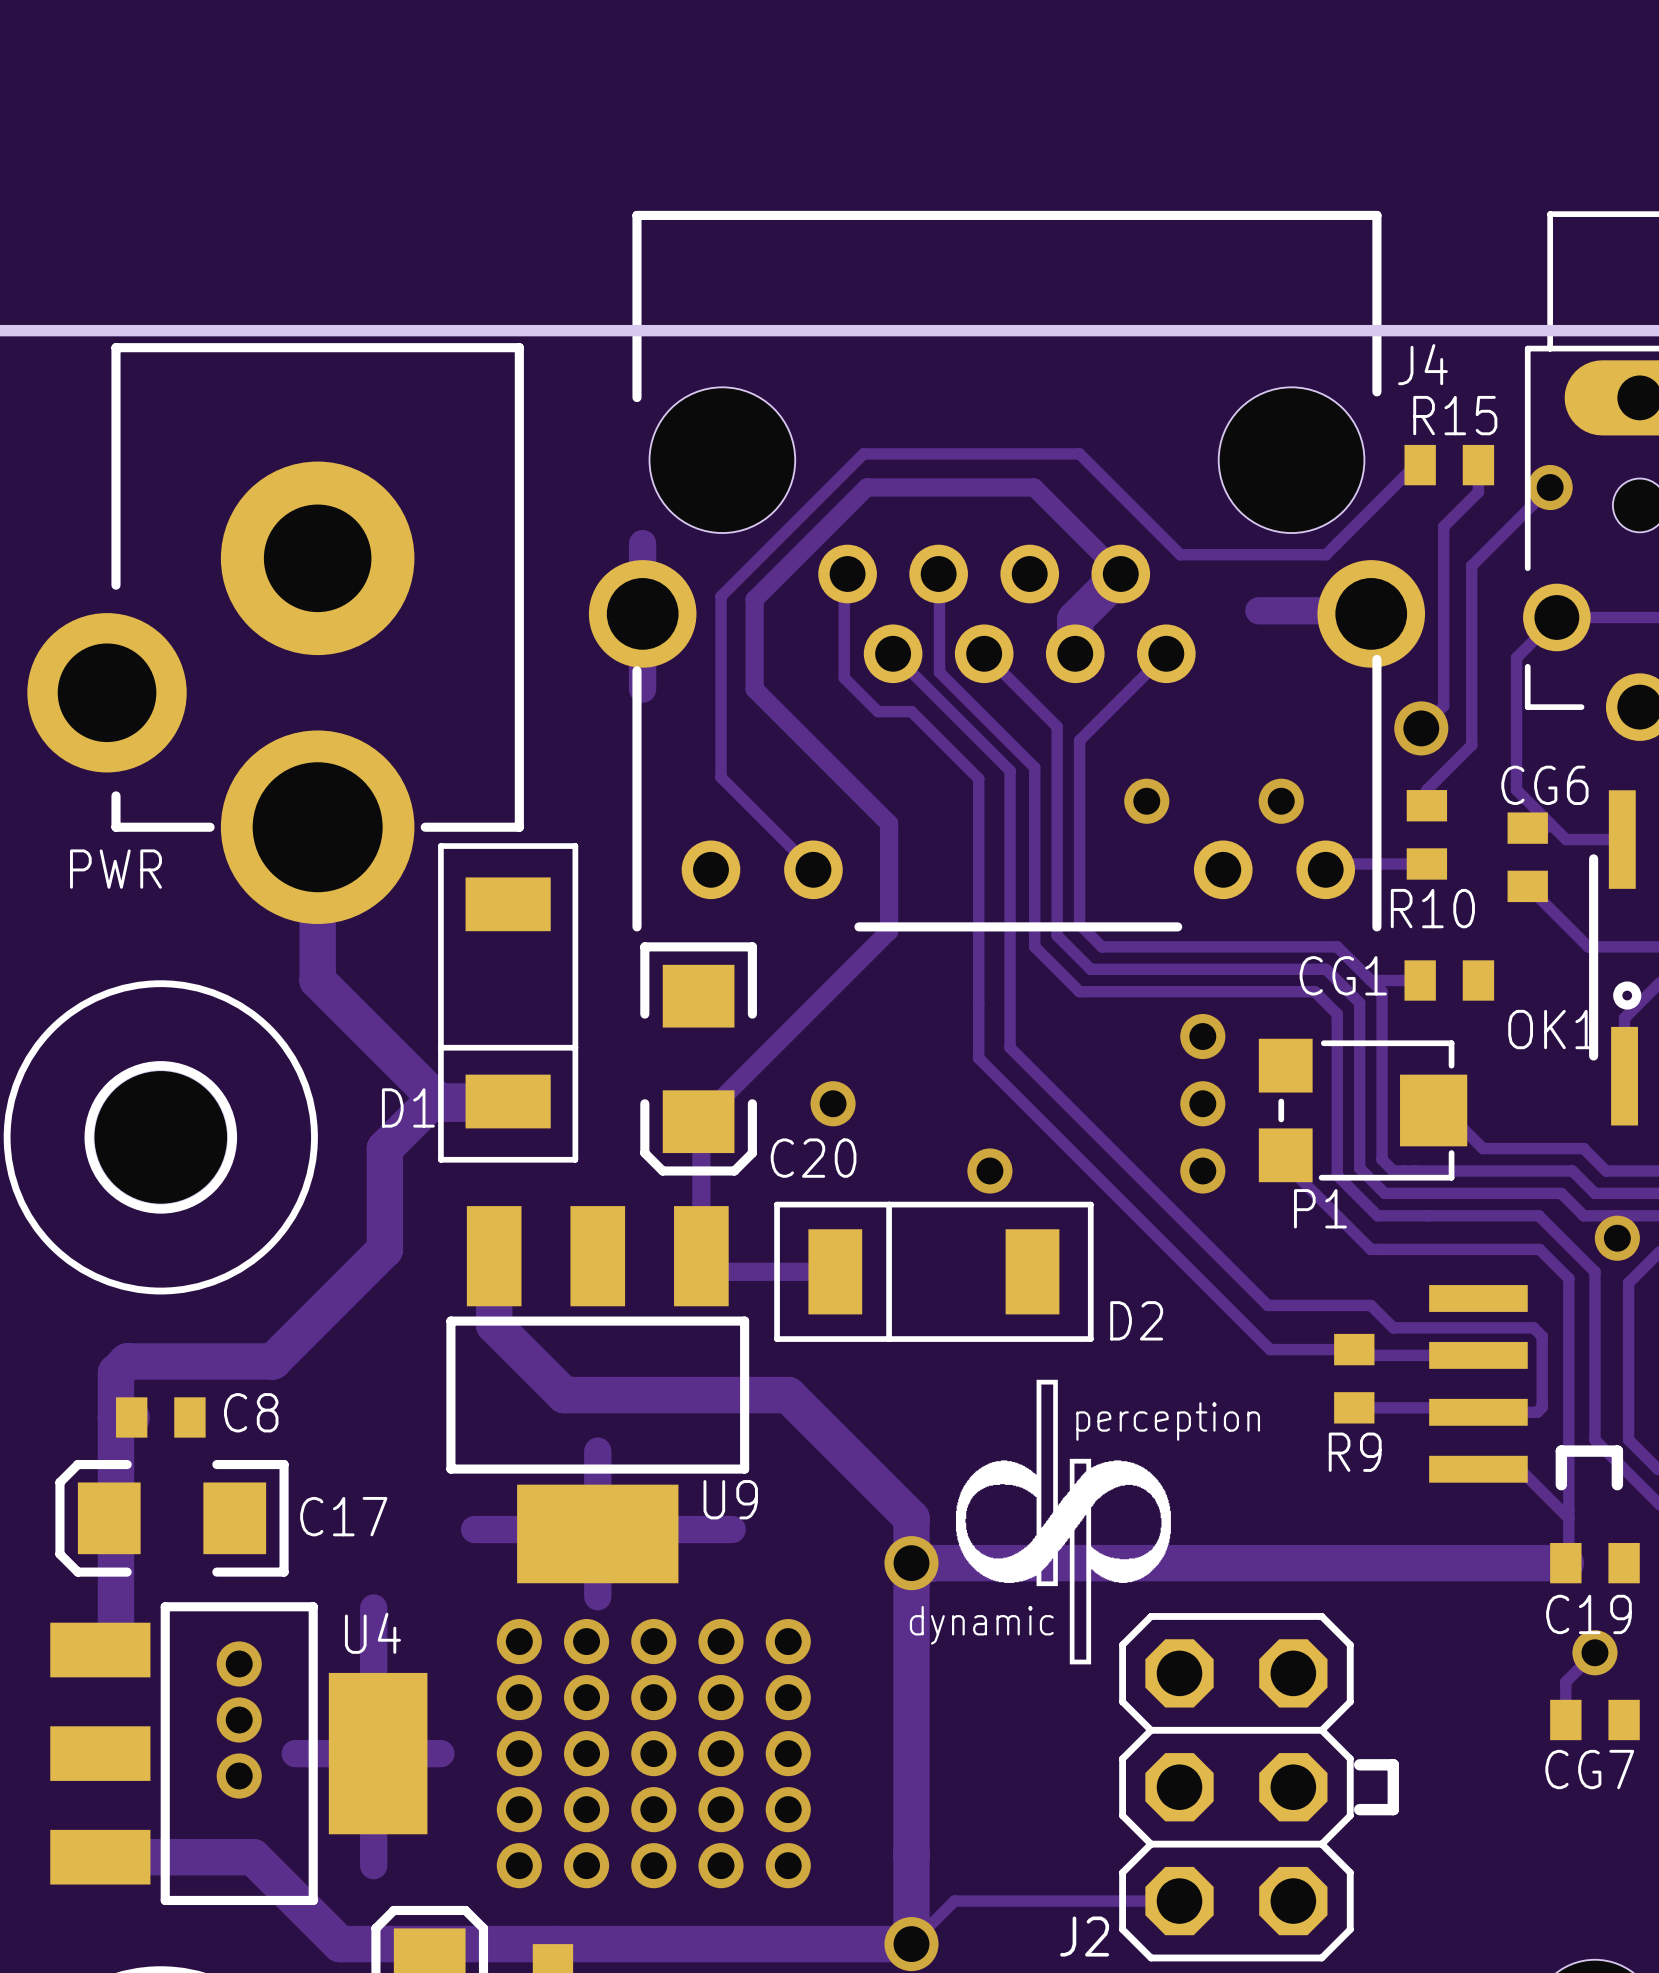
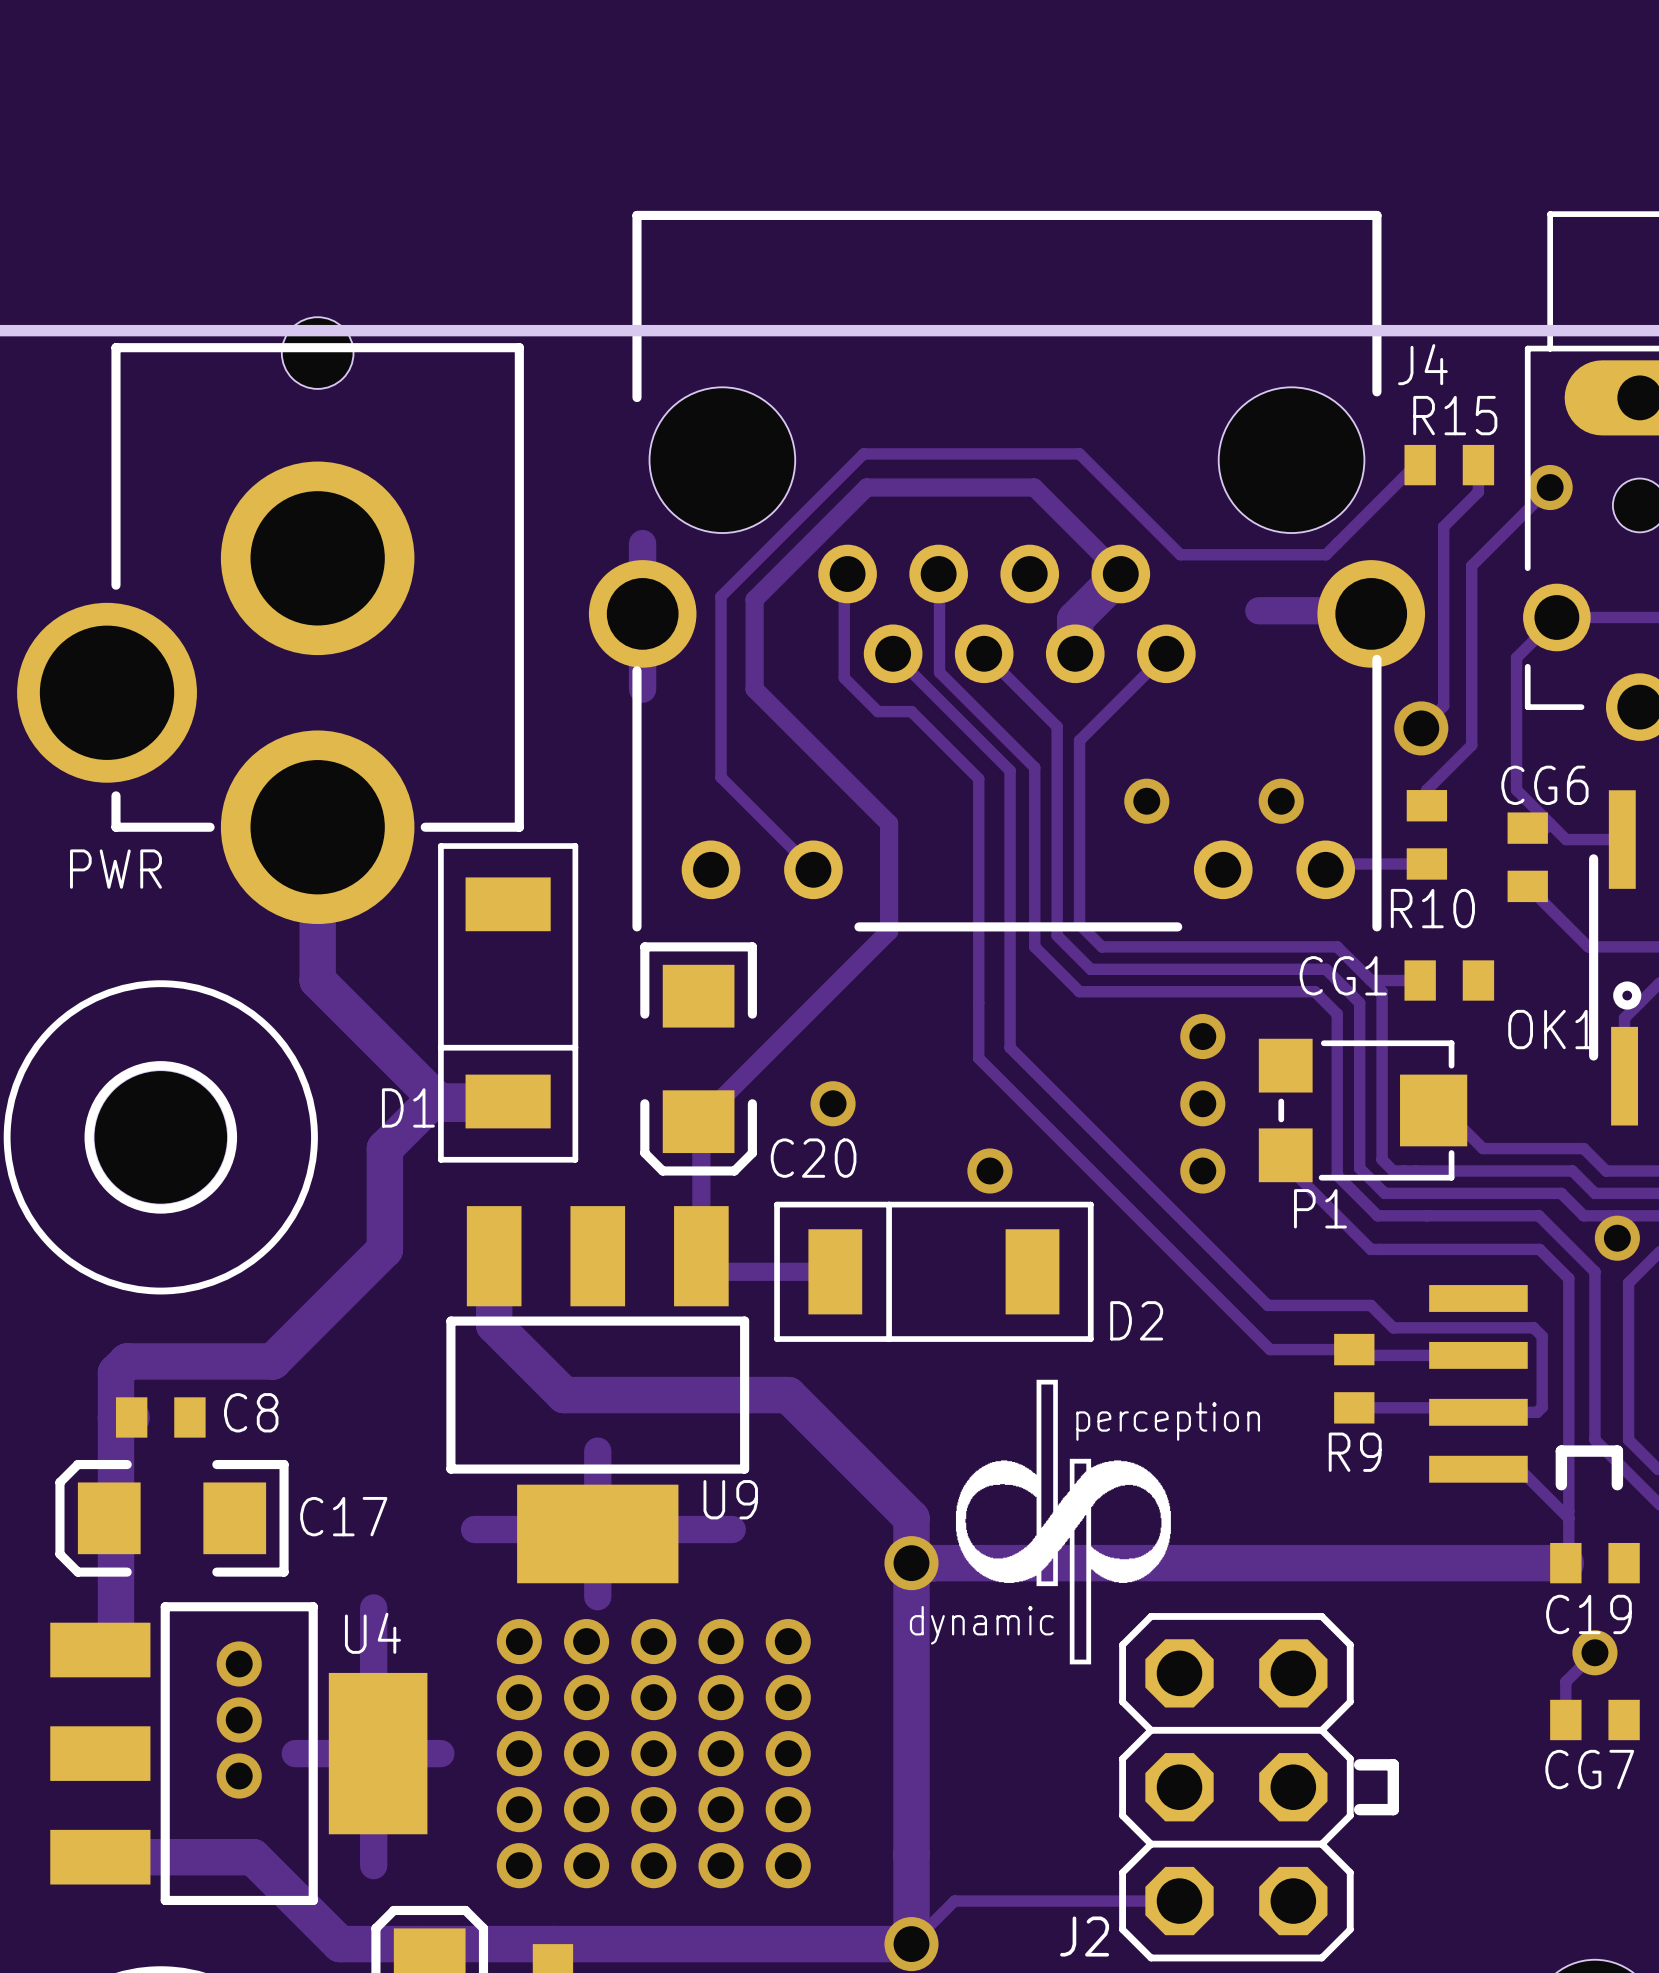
PWR footprint: [27, 343, 524, 924] -> [17, 317, 524, 924]

